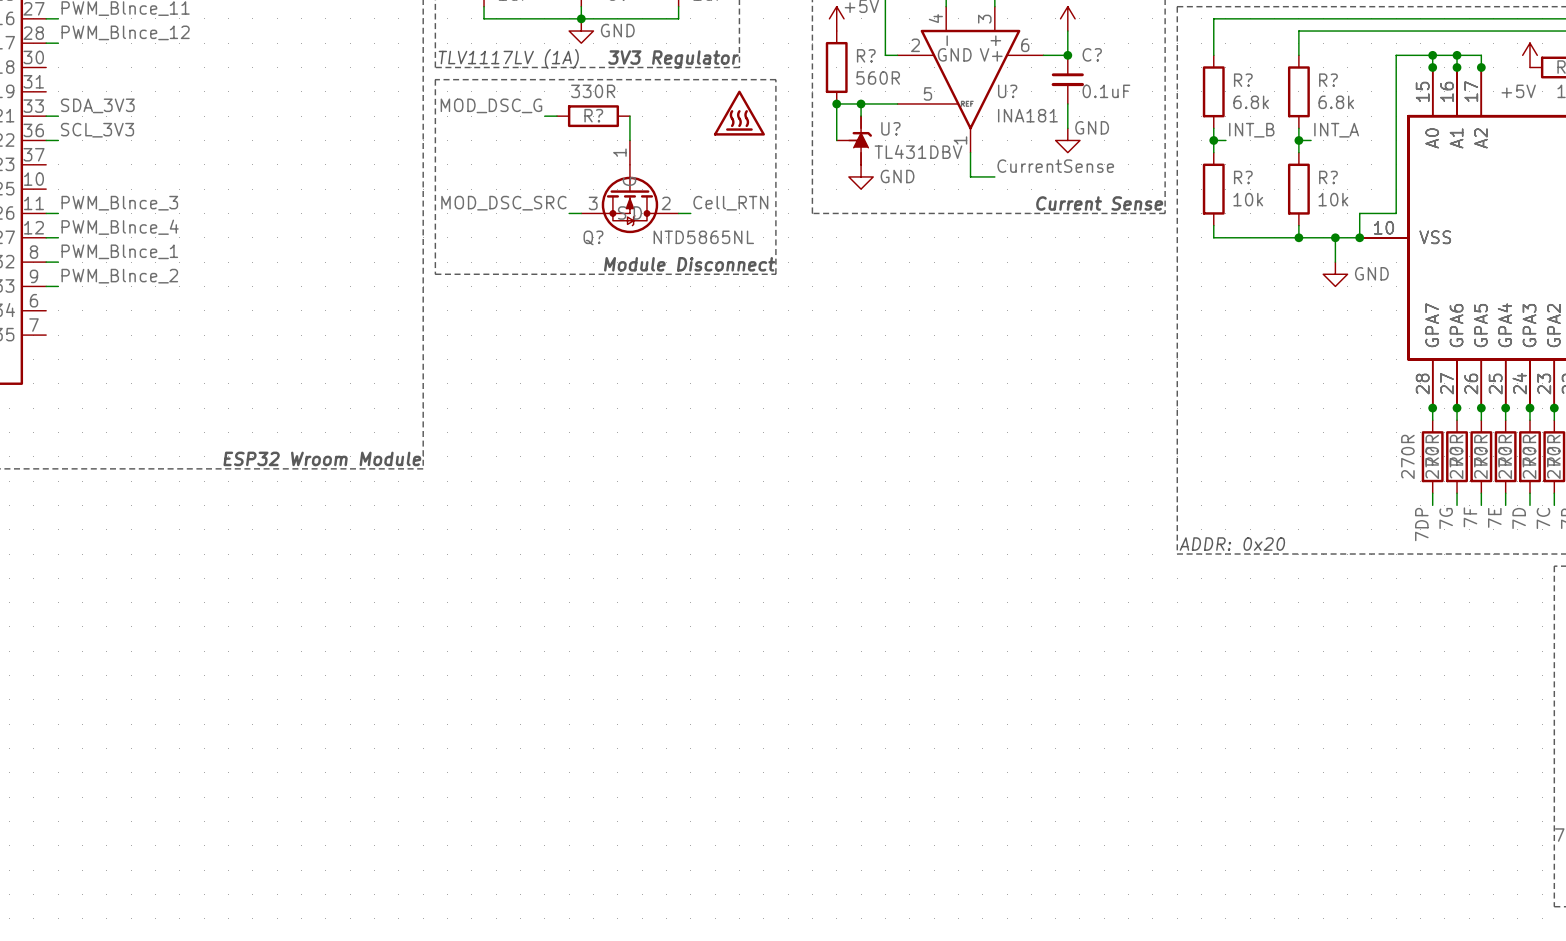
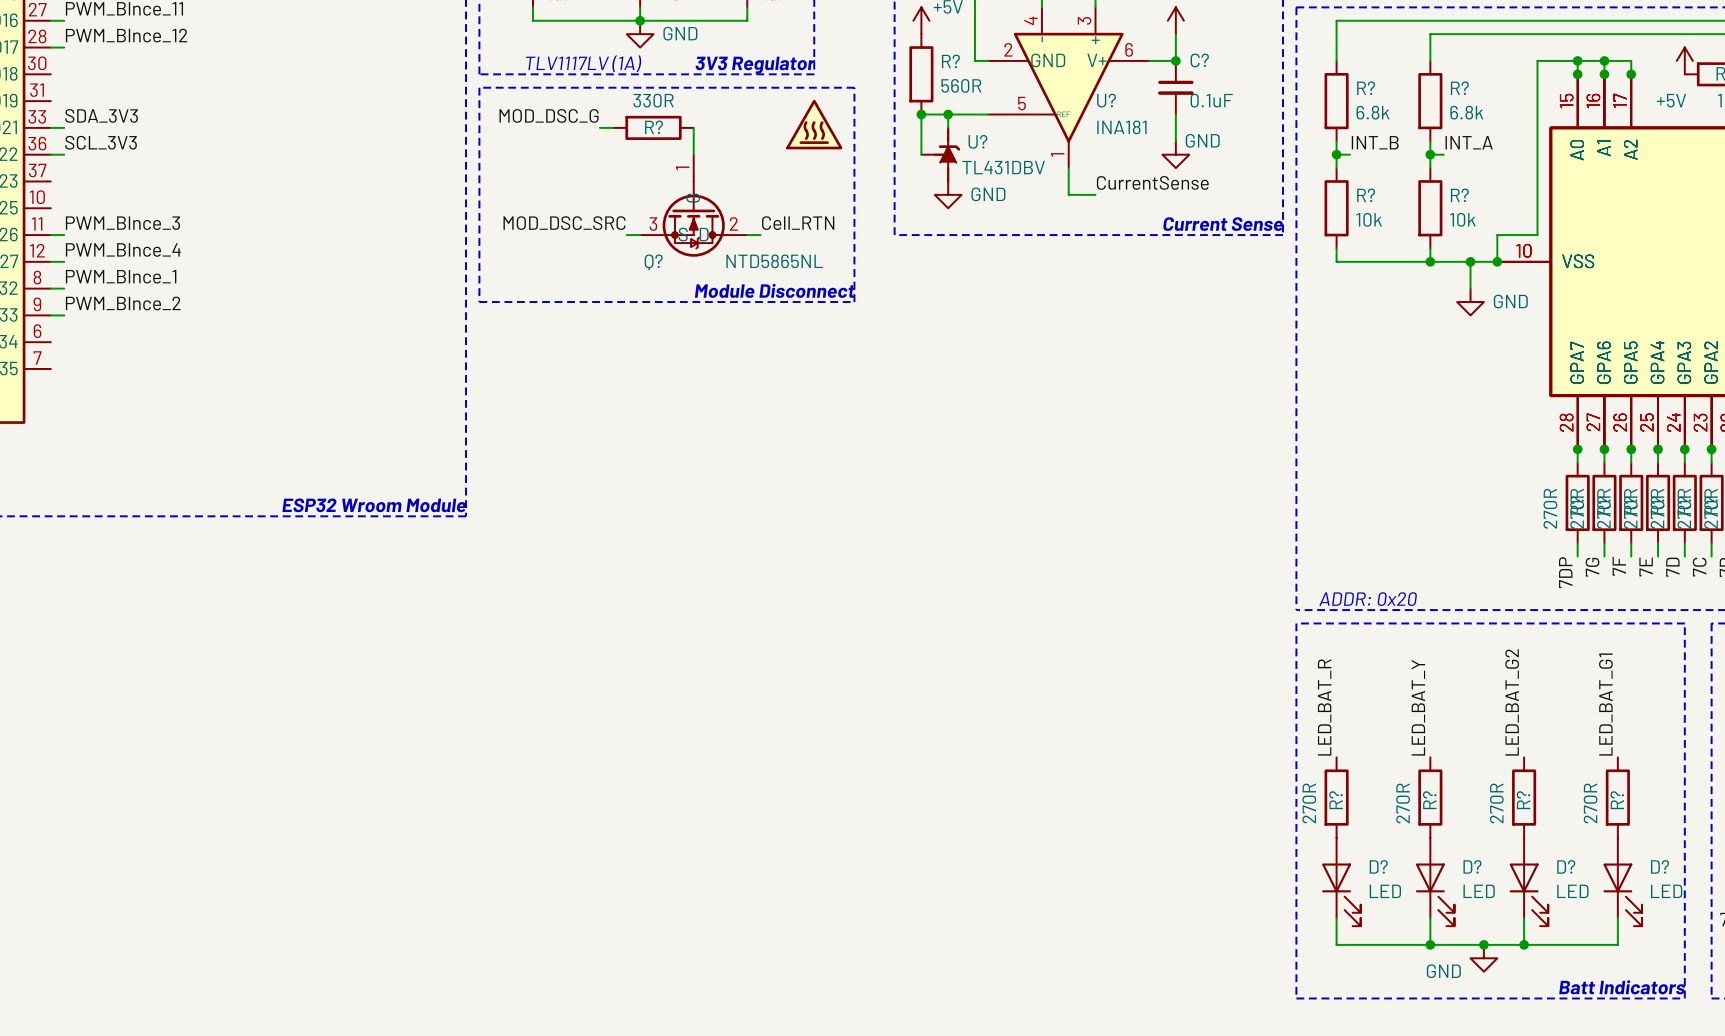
line: none -> (1296, 623) (1684, 623) (1684, 998) (1296, 998) (1296, 623)
label: none -> LED_BAT_G2 (1512, 702)
label: none -> LED_BAT_G1 (1605, 704)
label: none -> LED_BAT_R (1324, 707)
label: none -> LED_BAT_Y (1418, 707)
R?: none -> 270R (1336, 797)
R?: none -> 270R (1430, 797)
R?: none -> 270R (1524, 797)
R?: none -> 270R (1617, 797)
D?: none -> LED (1341, 881)
D?: none -> LED (1435, 881)
D?: none -> LED (1528, 881)
D?: none -> LED (1622, 881)
wire: none -> (1336, 918) (1336, 944) (1617, 944) (1617, 918)
wire: none -> (1430, 918) (1430, 944)
wire: none -> (1524, 918) (1524, 944)
junction: none -> (1430, 944)
junction: none -> (1483, 944)
junction: none -> (1524, 944)
power symbol: none -> GND (1483, 958)
text: none -> Batt Indicators (1622, 987)

